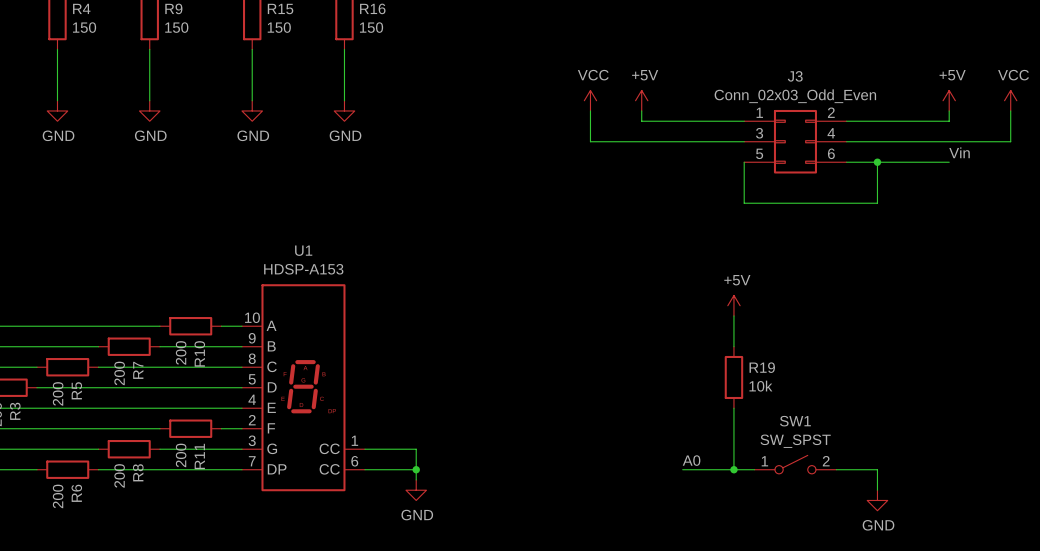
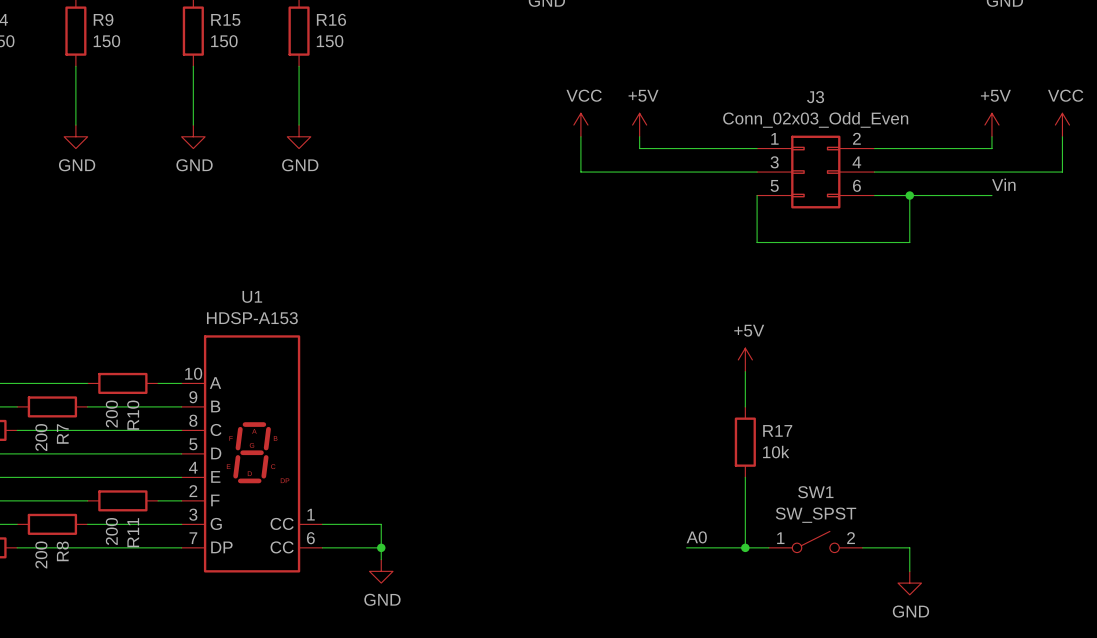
R19 name: R19 (762, 367) -> R17 (777, 430)

